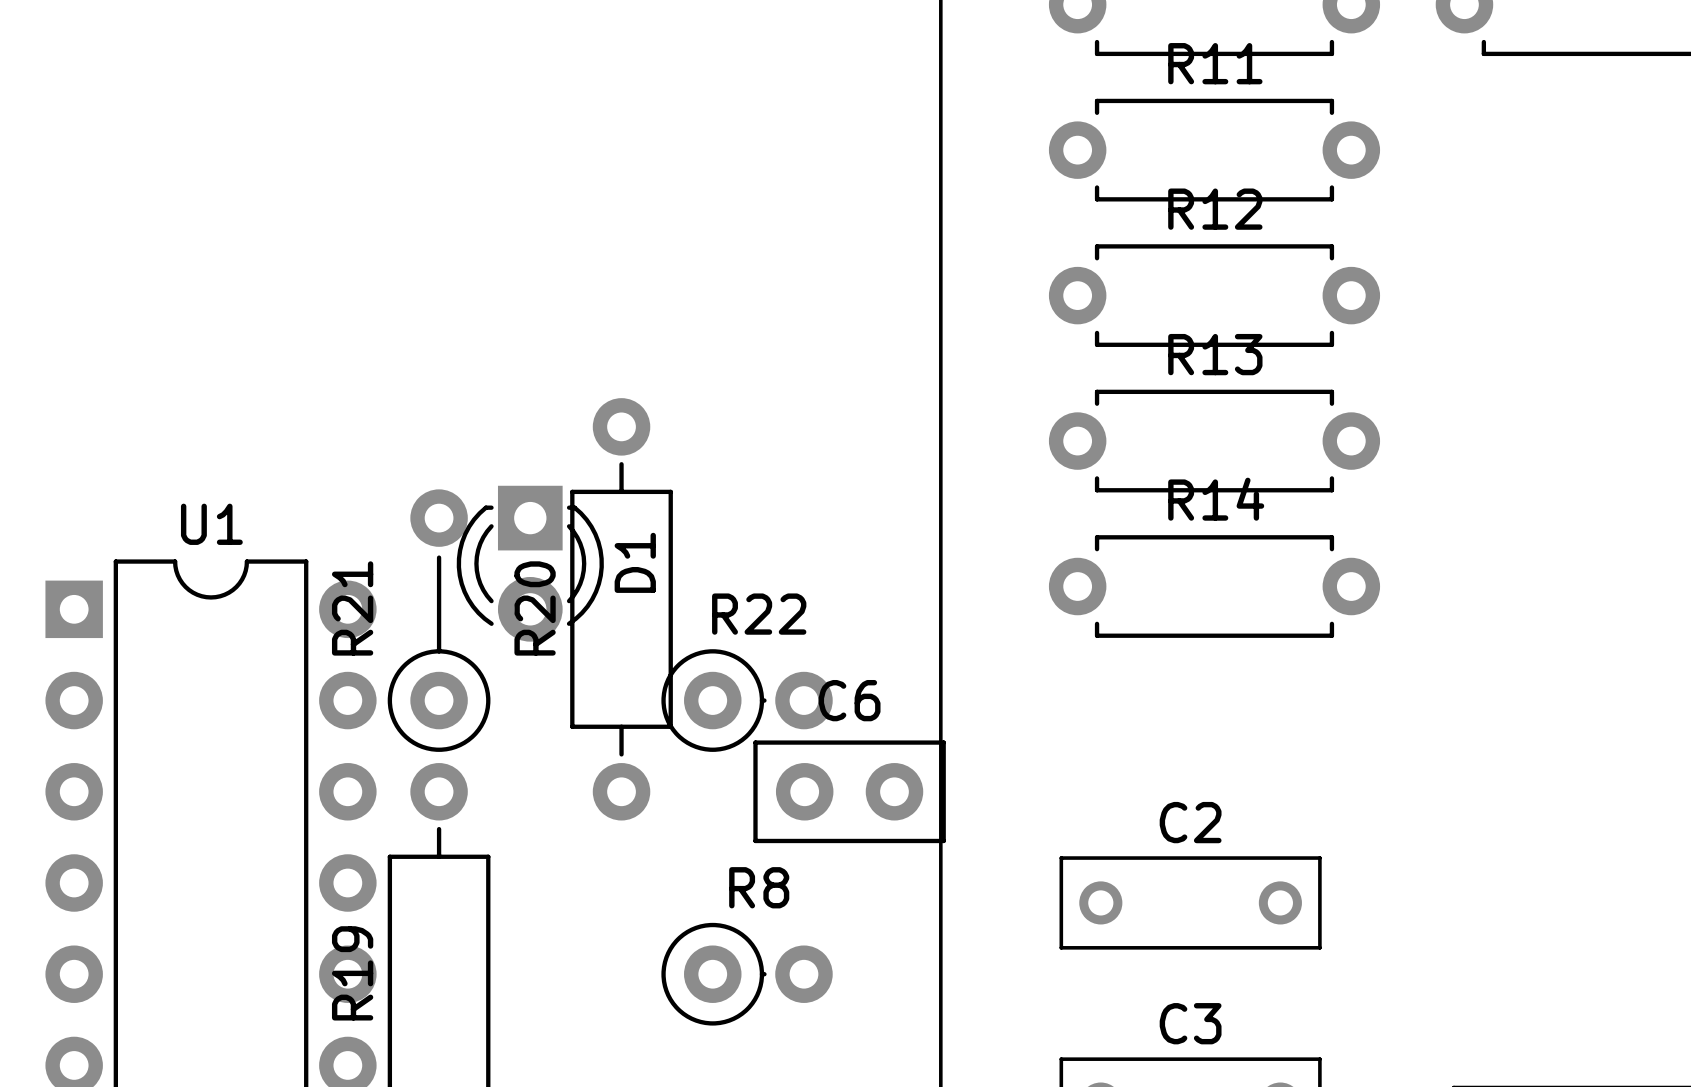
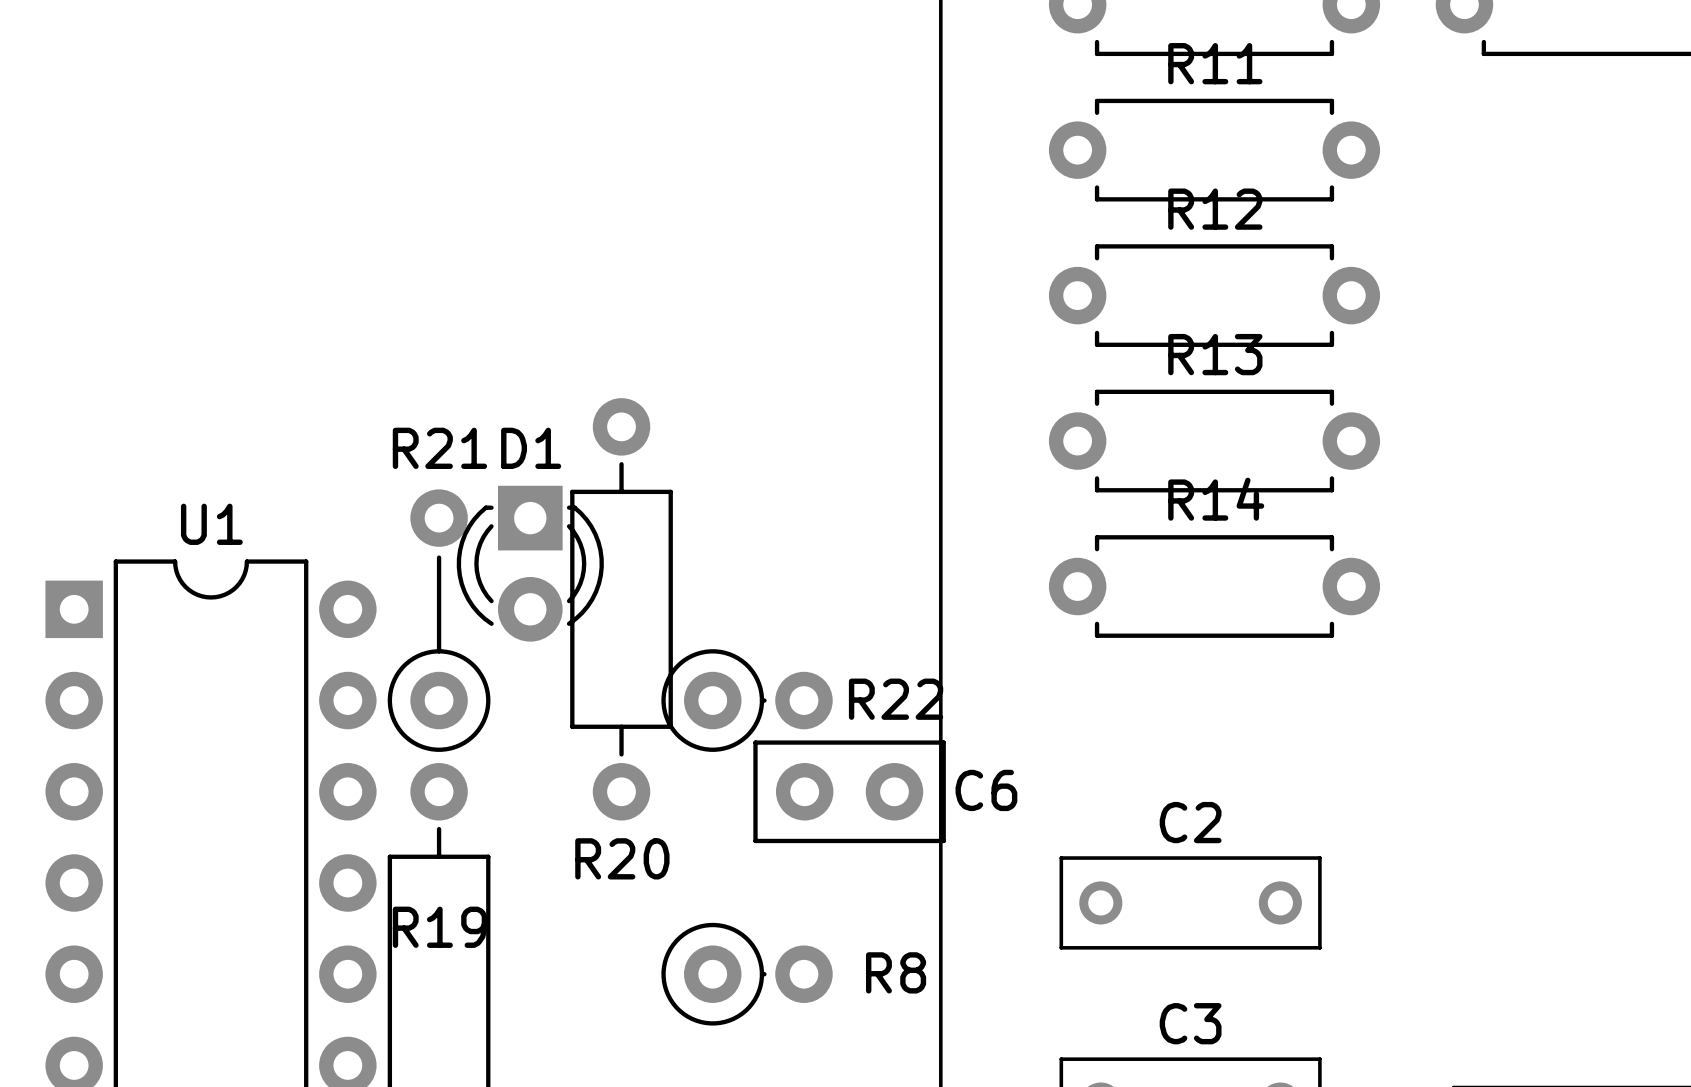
D1 name rotation: 0° (635, 562) -> 90° clockwise (531, 448)
D1 name position: D1 (635, 562) -> D1 (531, 448)
R21 name rotation: 0° (352, 608) -> 90° clockwise (439, 448)
R21 name position: R21 (352, 608) -> R21 (439, 448)
R20 name rotation: 0° (535, 608) -> 90° clockwise (622, 858)
R20 name position: R20 (535, 608) -> R20 (622, 858)
R22 name position: R22 (759, 614) -> R22 (896, 699)
C6 name position: C6 (849, 700) -> C6 (986, 790)
R8 name position: R8 (759, 887) -> R8 (896, 972)
R19 name rotation: 0° (352, 973) -> 90° clockwise (439, 927)

